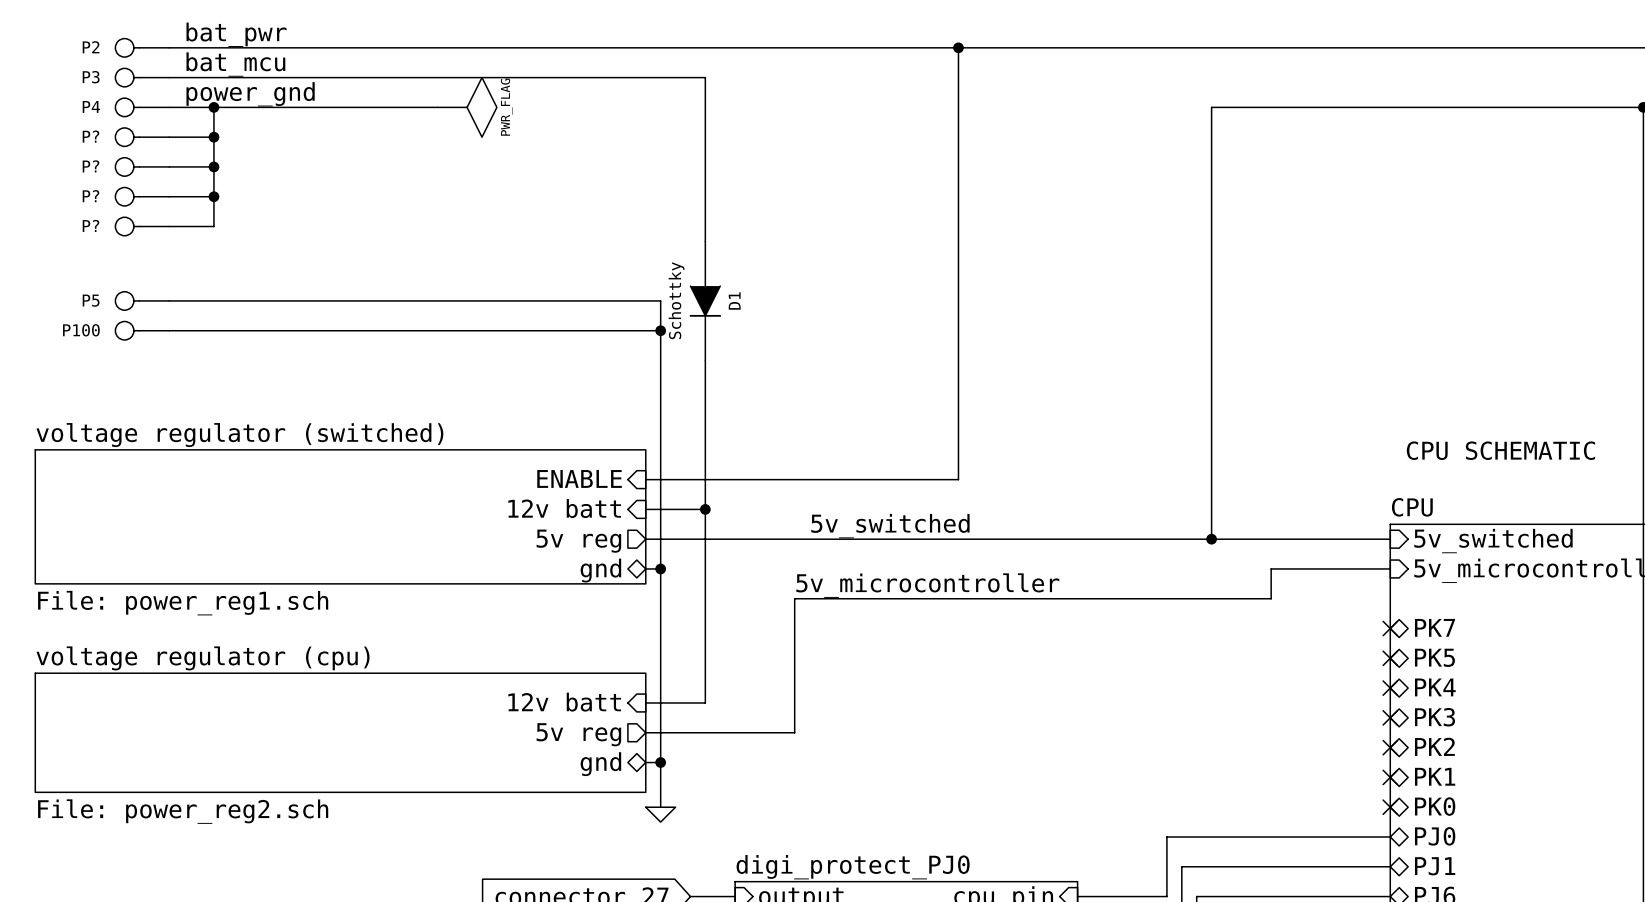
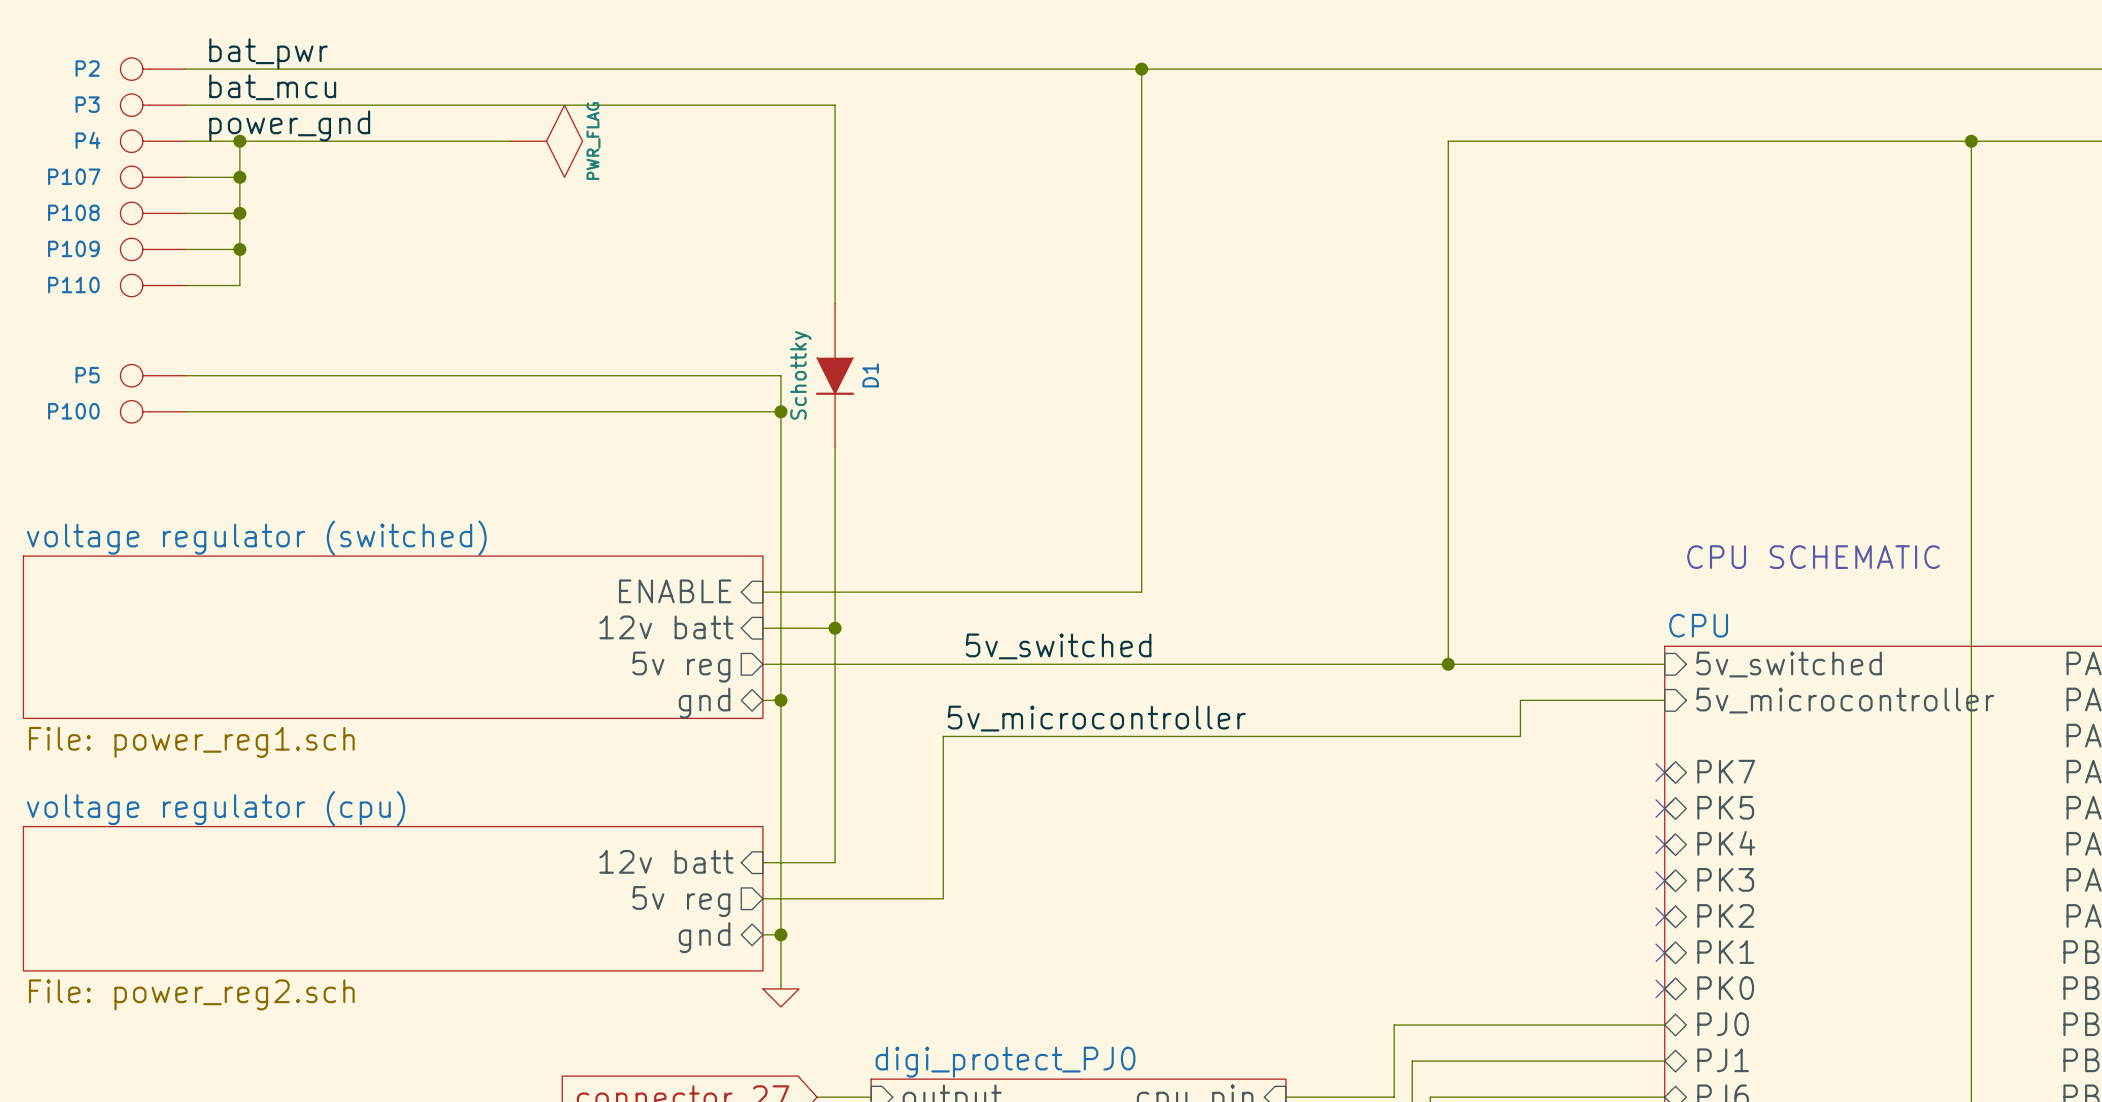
P? name: P? (90, 136) -> P107 (74, 176)
P? name: P? (90, 166) -> P108 (73, 212)
P? name: P? (90, 196) -> P109 (73, 248)
P? name: P? (90, 225) -> P110 (73, 284)

